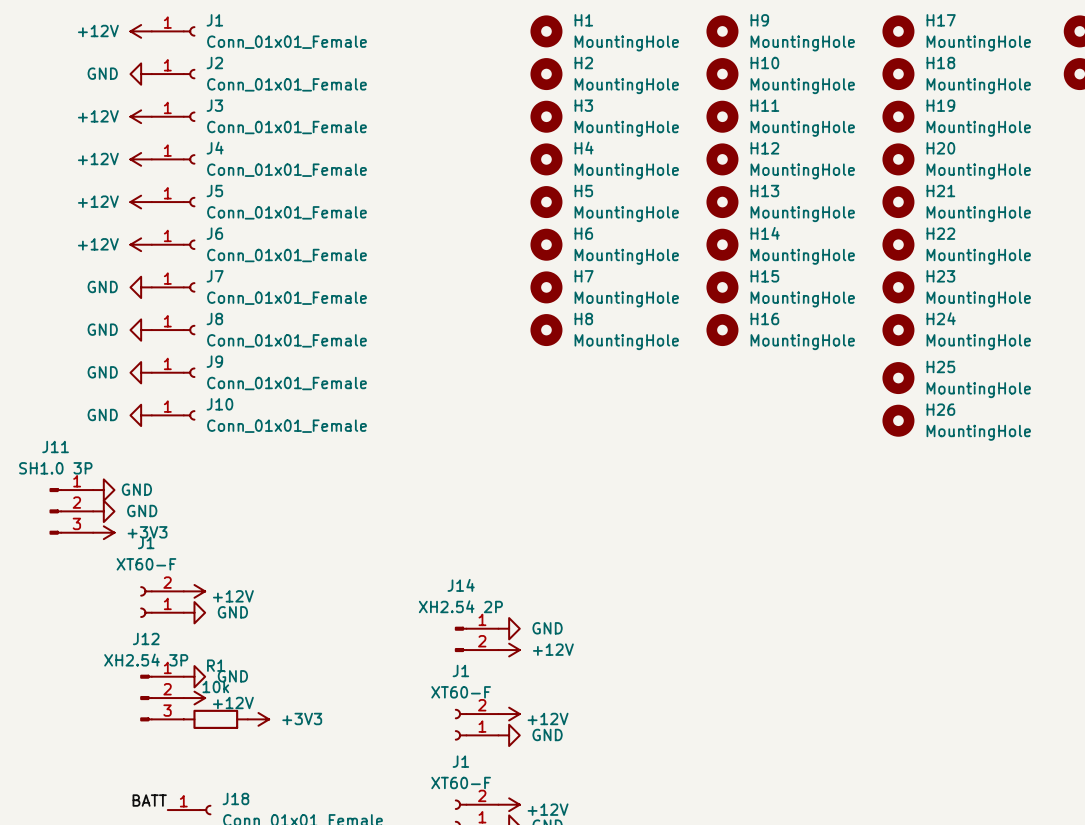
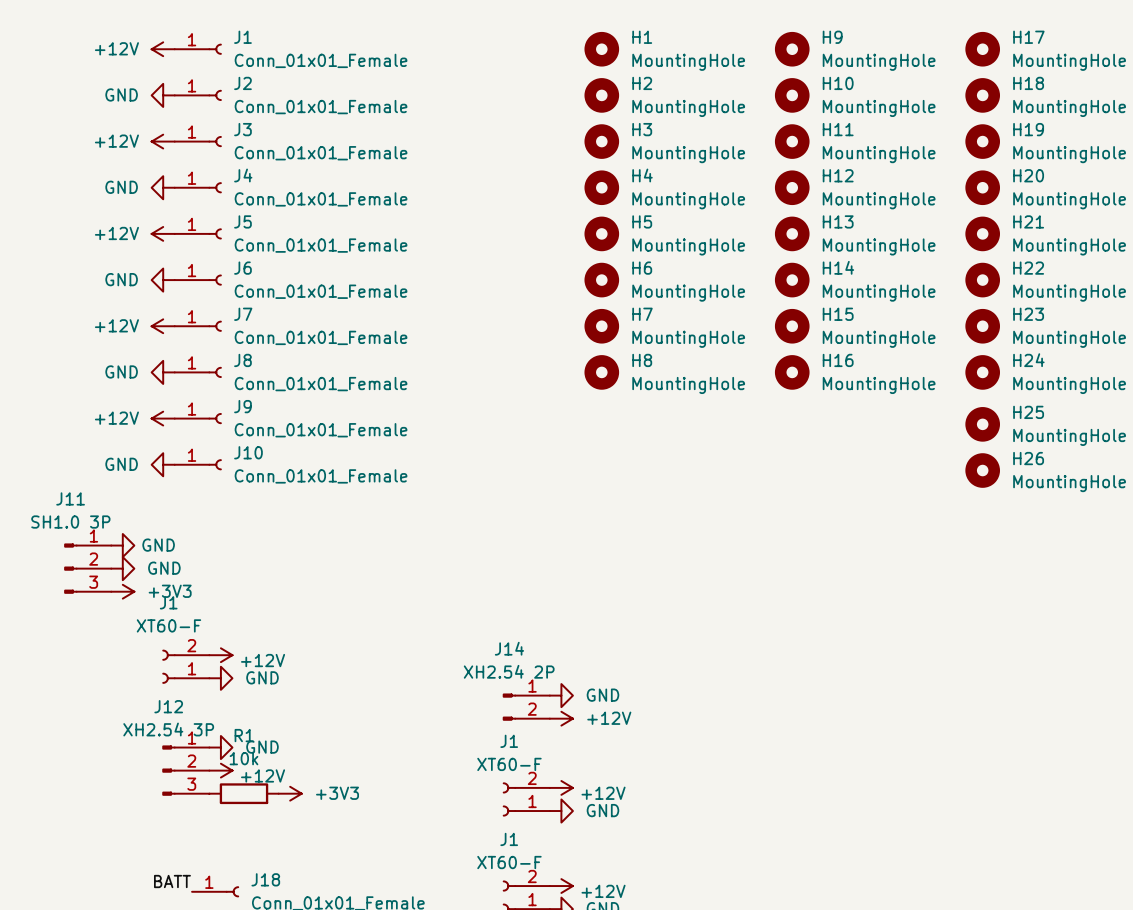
power symbol: +12V (141, 159) -> GND (163, 187)
power symbol: +12V (141, 244) -> GND (163, 280)
power symbol: GND (141, 287) -> +12V (163, 326)
power symbol: GND (141, 372) -> +12V (163, 418)

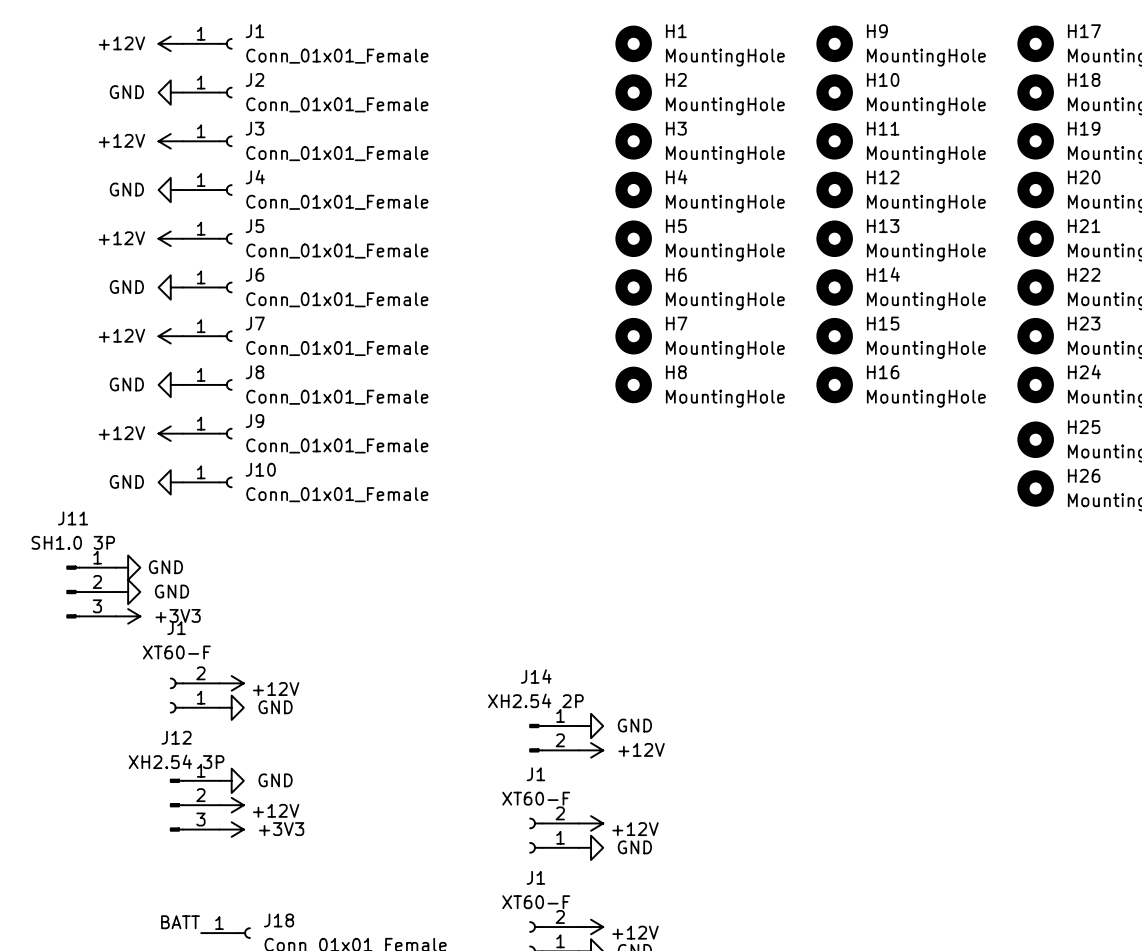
R1: 10k (243, 793) -> none
power symbol position: +3V3 (290, 793) -> +3V3 (231, 829)

